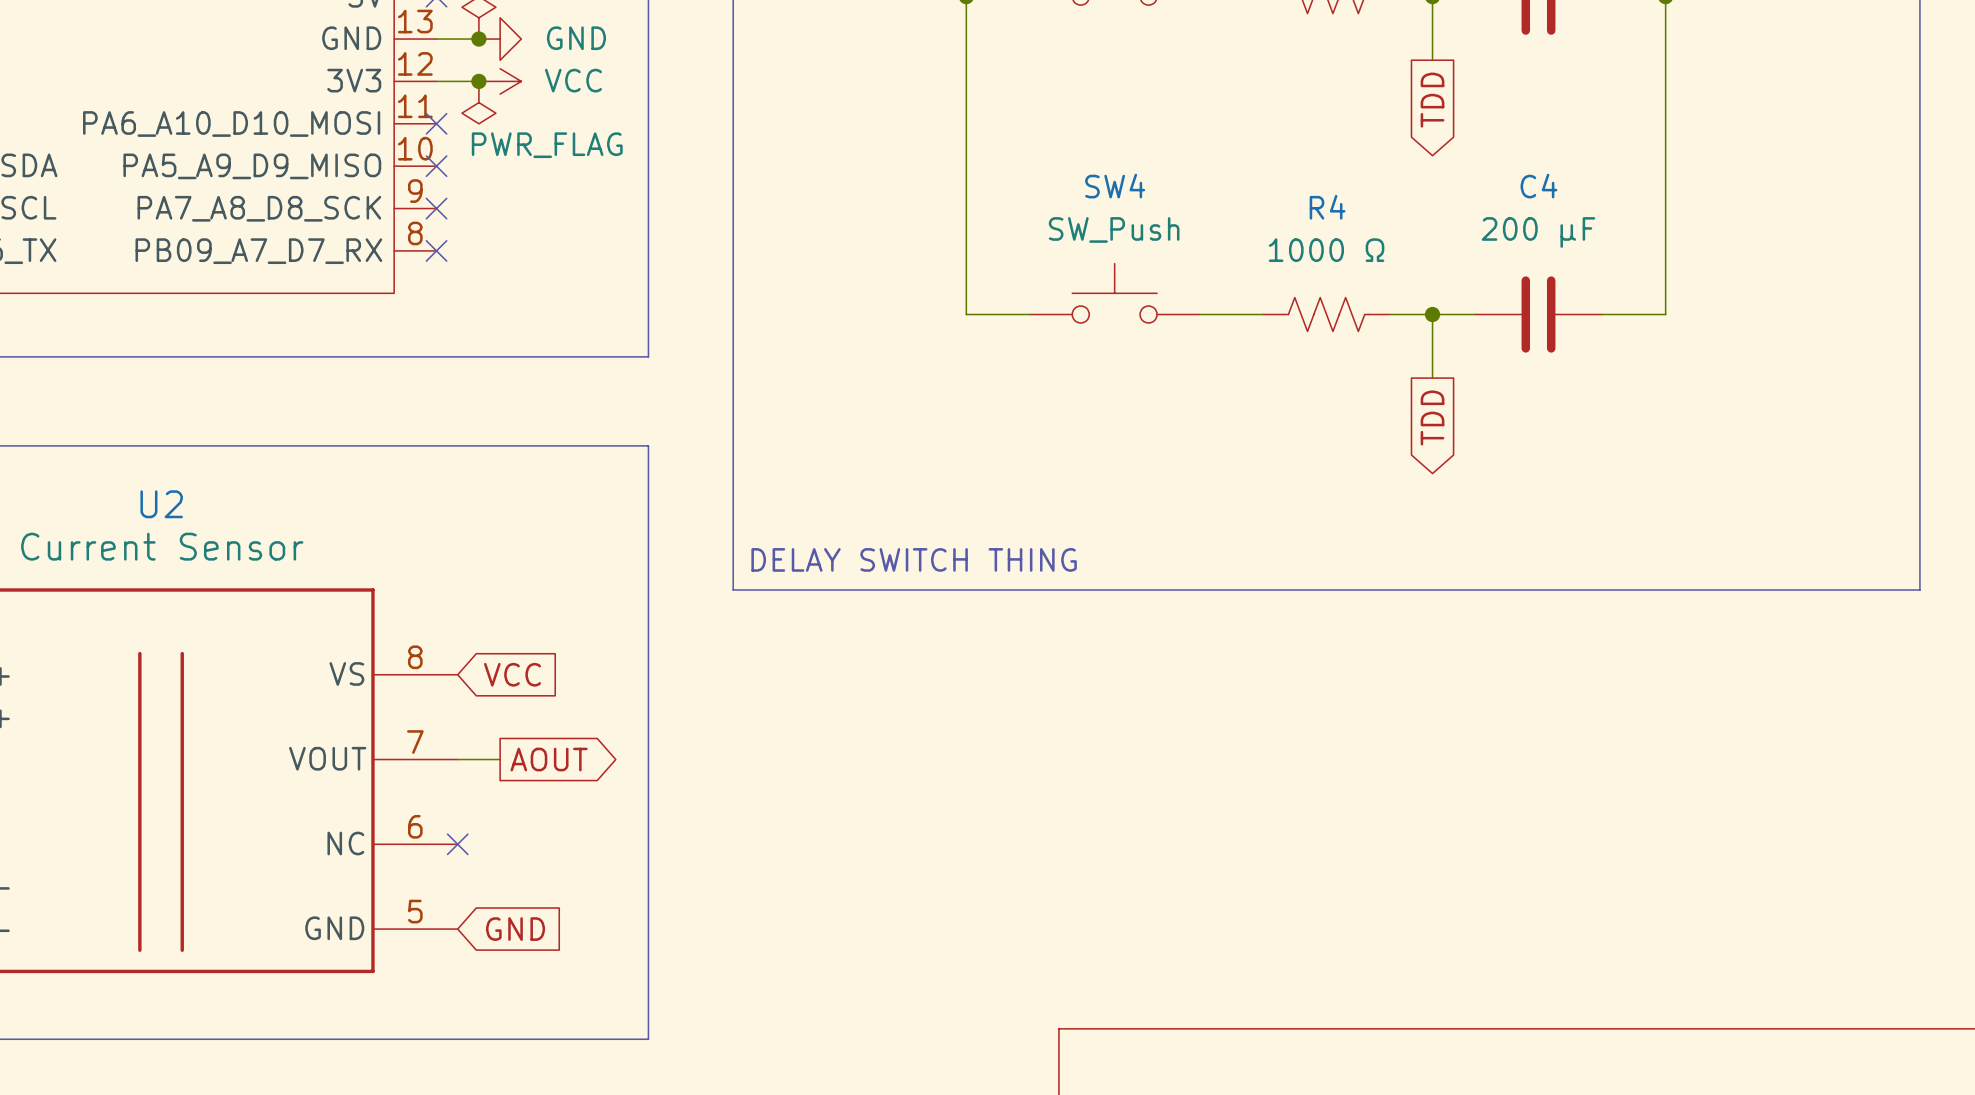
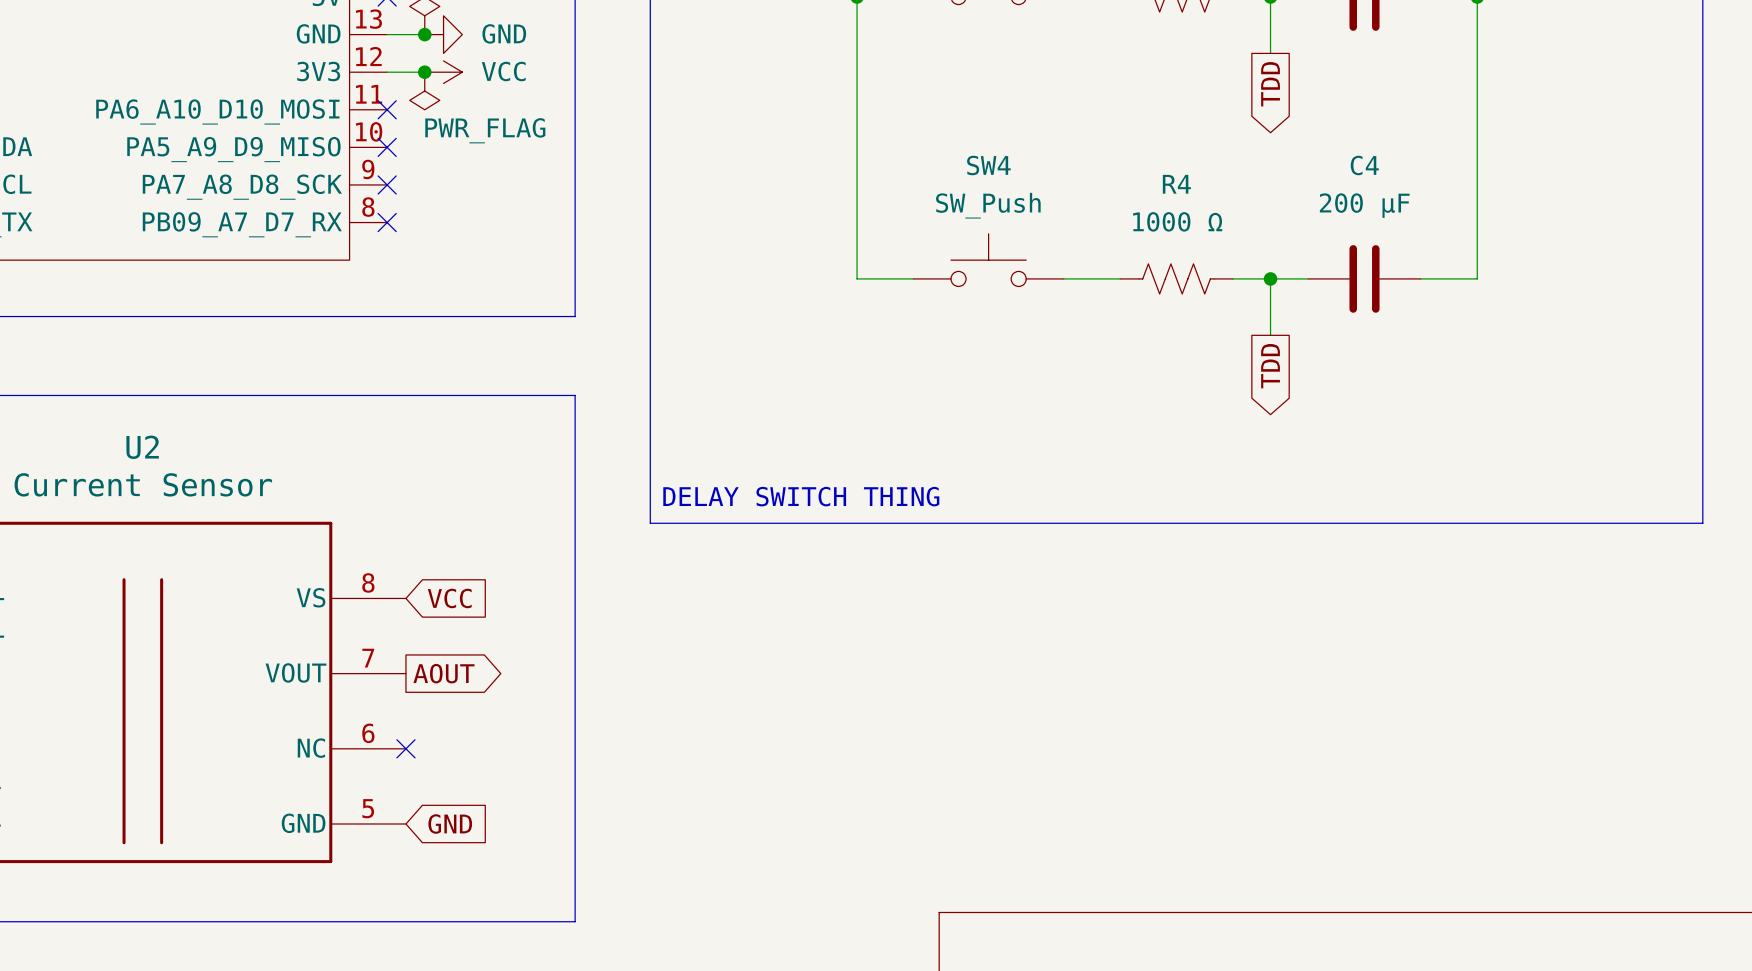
wire: (457, 759) (500, 759) -> none
global label position: AOUT (549, 759) -> AOUT (443, 673)

